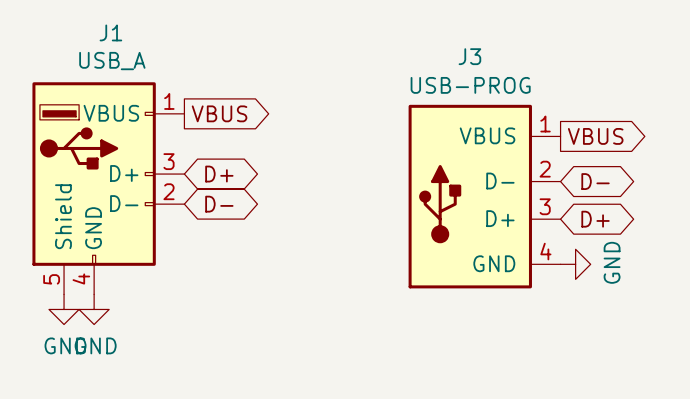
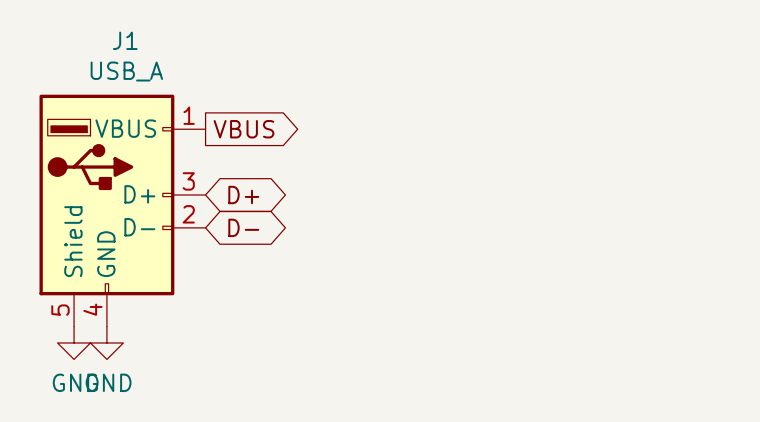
global label: VBUS (595, 136) -> none
global label: D- (595, 181) -> none
J3: USB-PROG (484, 196) -> none
global label: D+ (595, 219) -> none
power symbol: GND (575, 264) -> none

